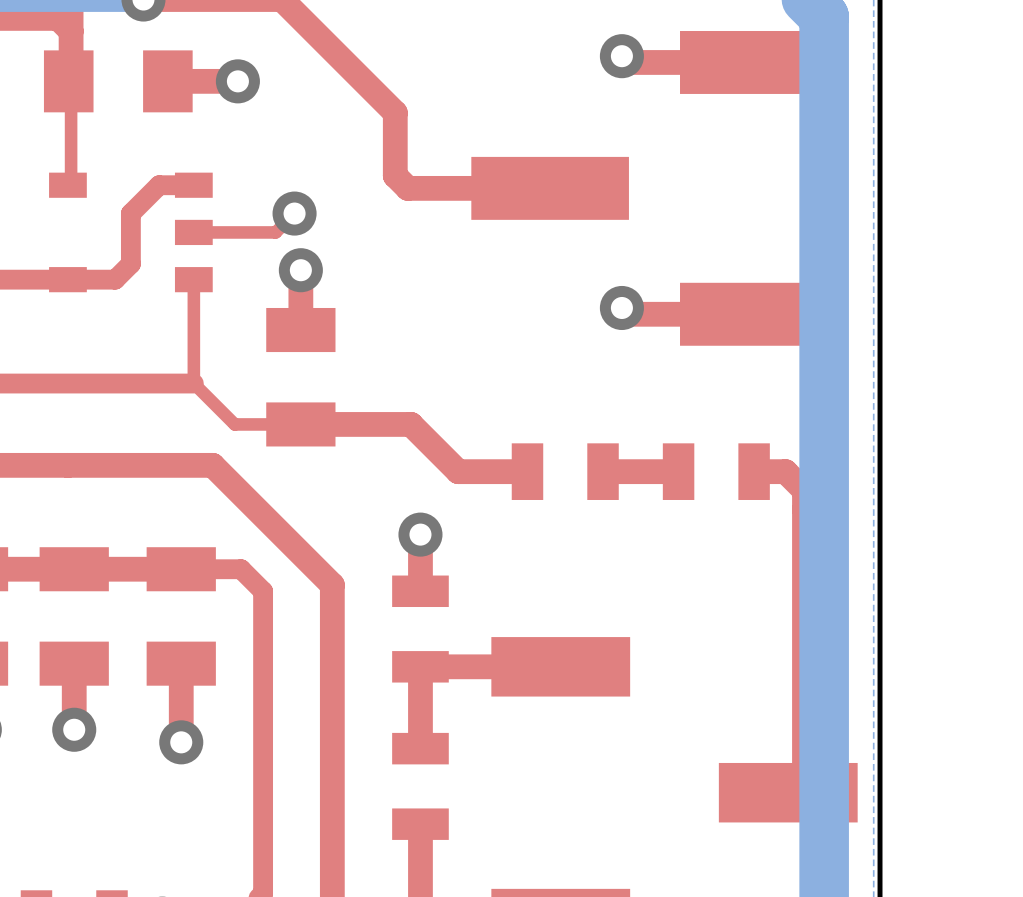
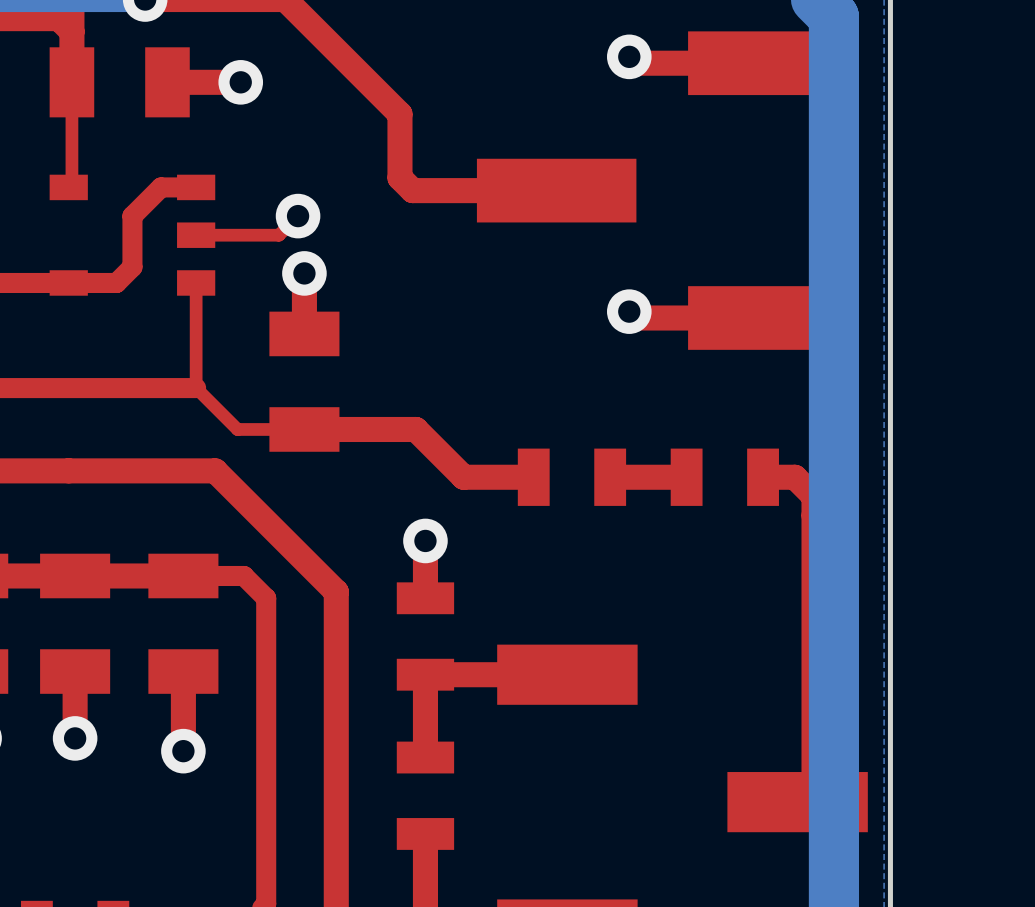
part footprint: [43, 50, 193, 113] -> [49, 47, 190, 118]

